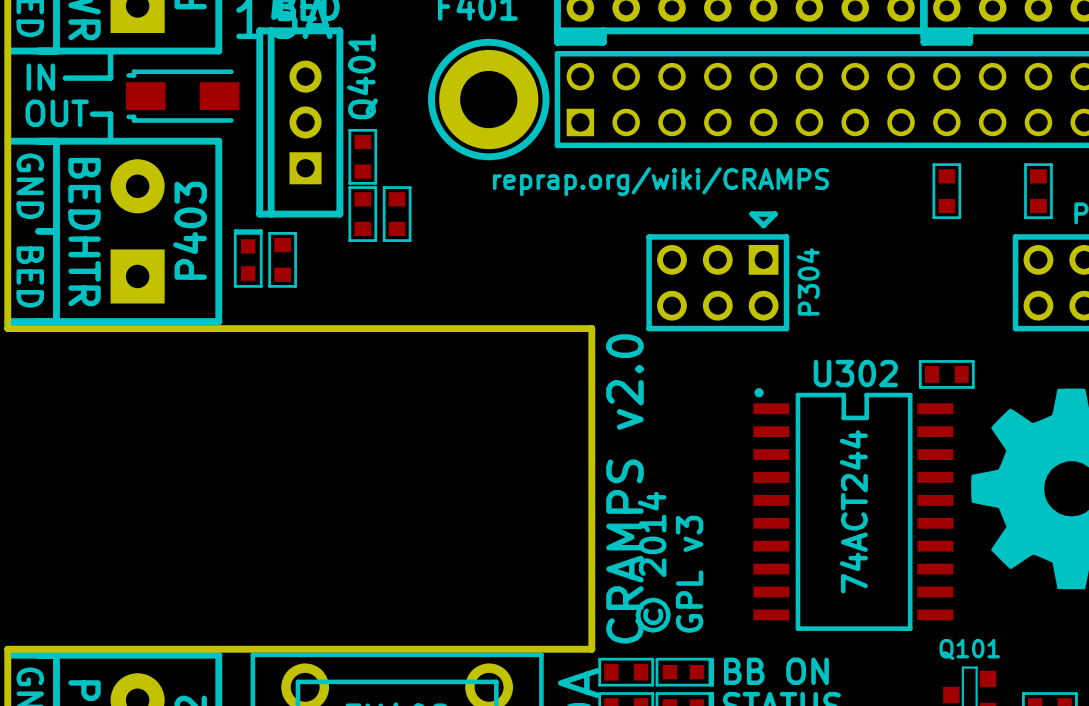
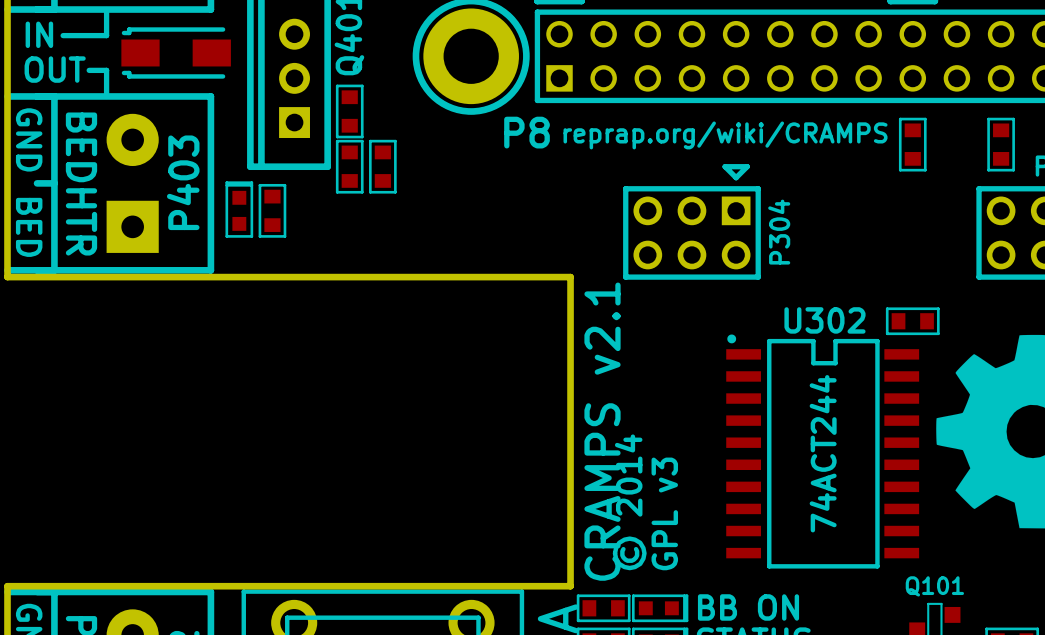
text: none -> P8 (527, 132)
text position: reprap.org/wiki/CRAMPS (660, 181) -> reprap.org/wiki/CRAMPS (725, 135)
text: CRAMPS v2.0 (624, 488) -> CRAMPS v2.1 (602, 431)

